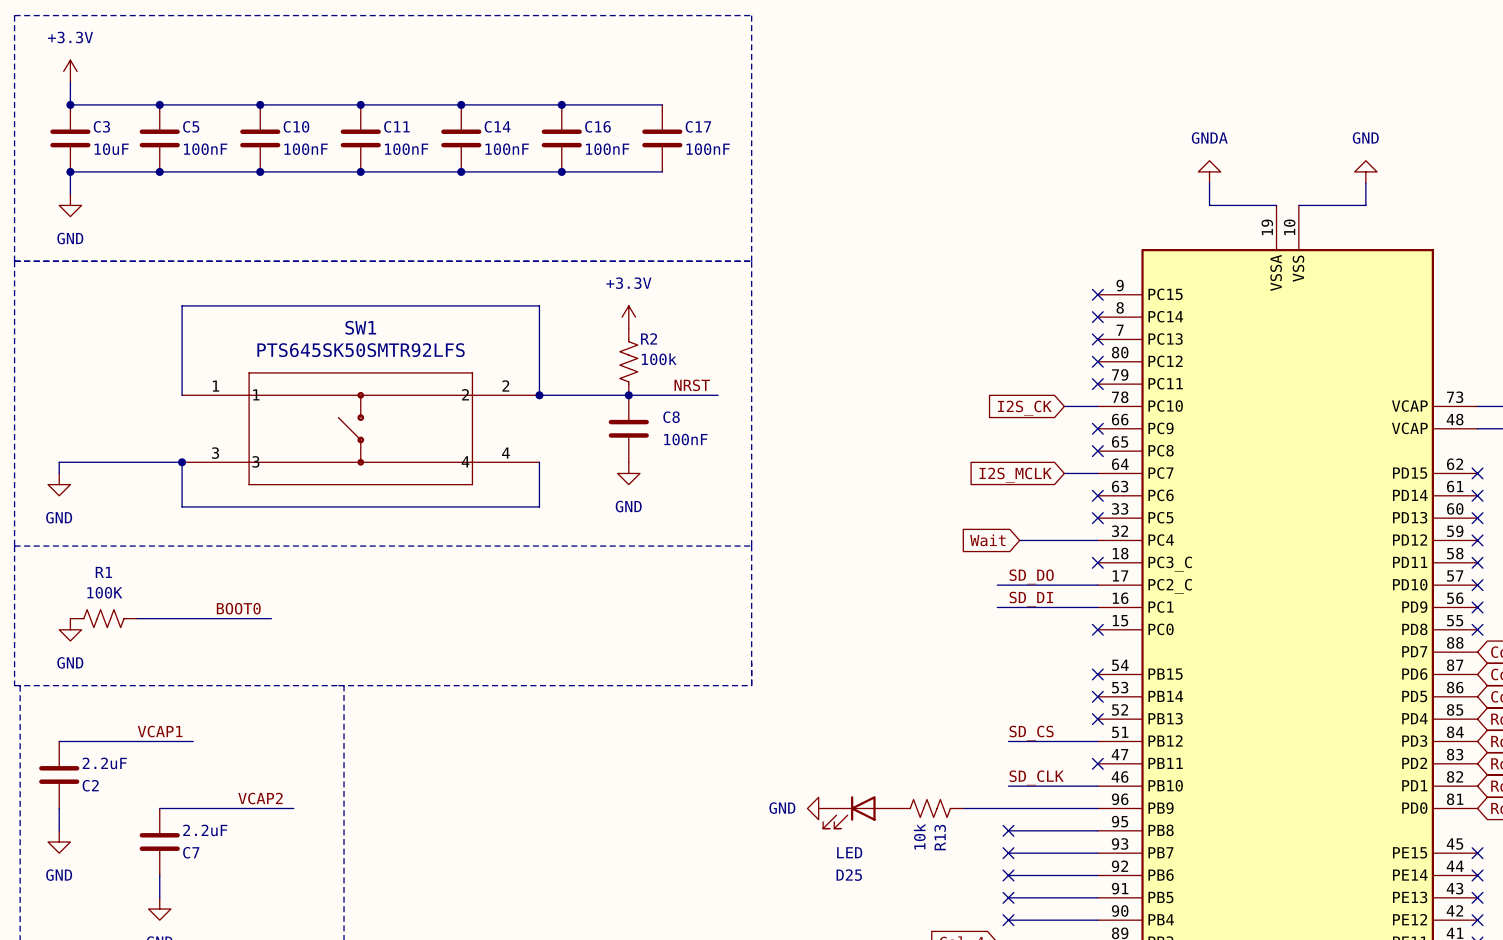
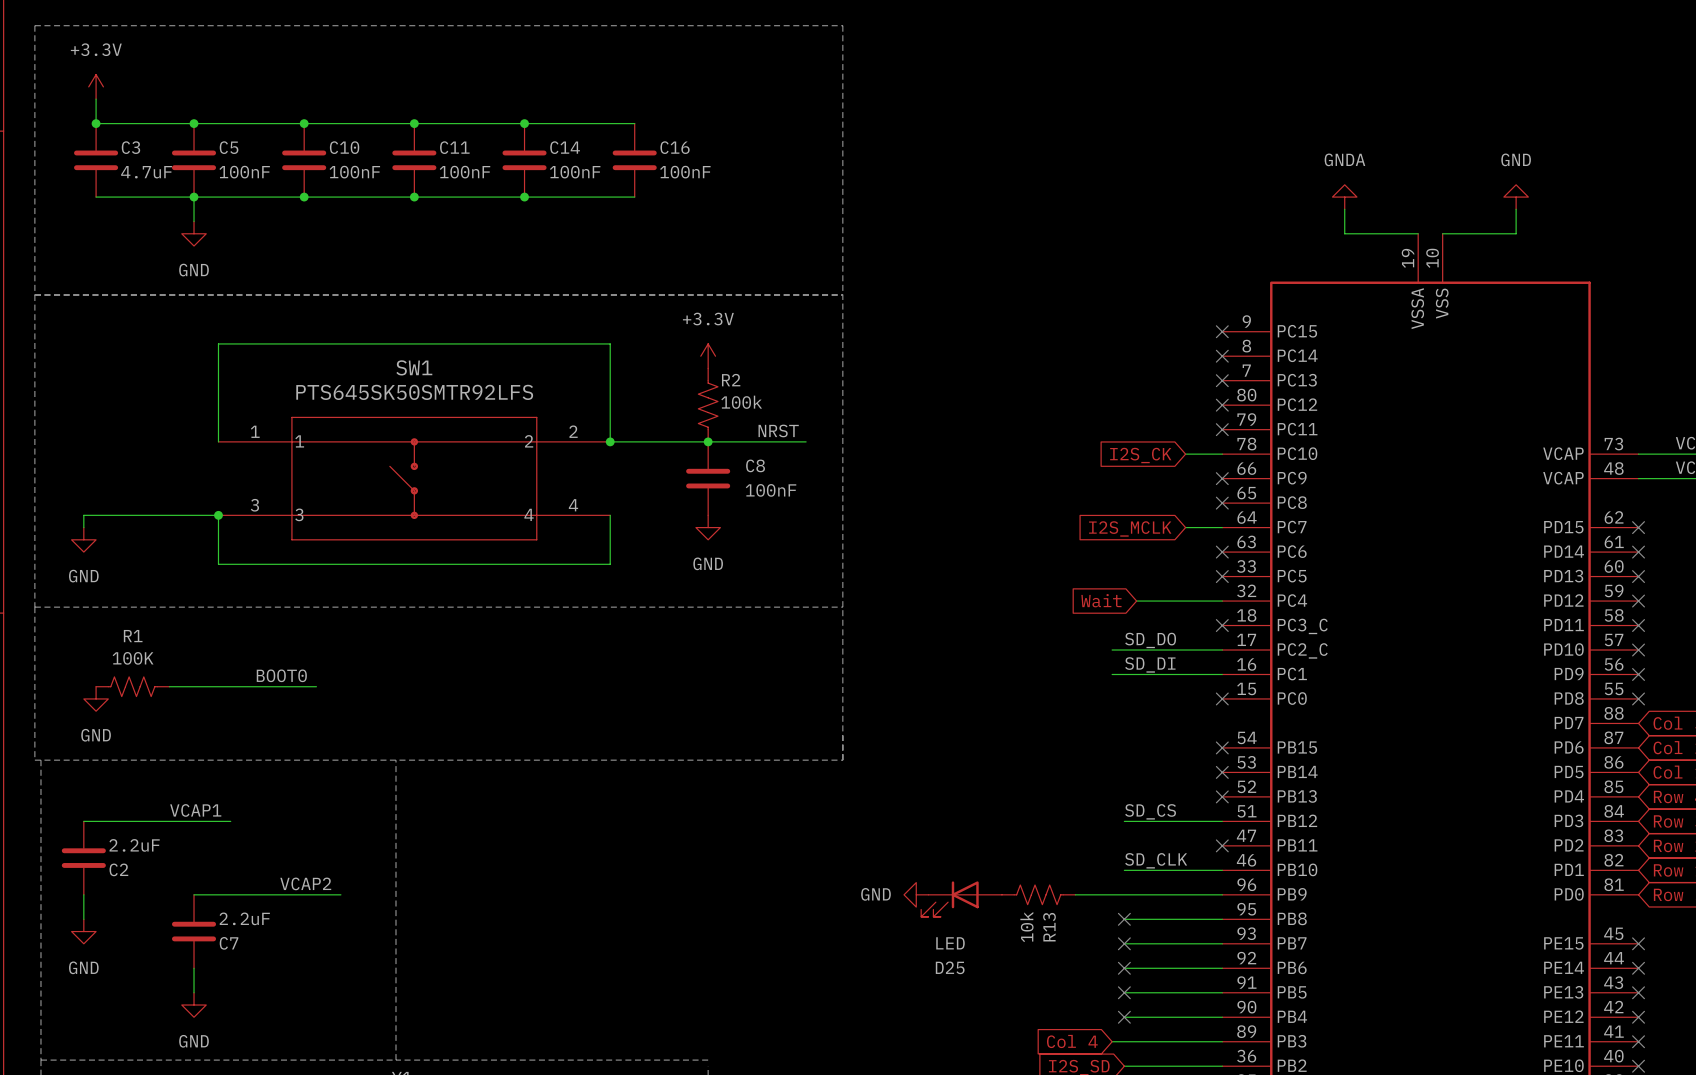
wire: (561, 104) (662, 104) -> none
junction: (561, 104) -> none
C17: 100nF (662, 138) -> none
C3 value: 10uF (111, 149) -> 4.7uF (146, 172)
wire: (70, 171) (70, 194) -> (194, 197) (194, 221)
junction: (70, 171) -> none
wire: (561, 171) (662, 171) -> none
junction: (561, 171) -> none
power symbol position: GND (70, 205) -> GND (194, 233)

